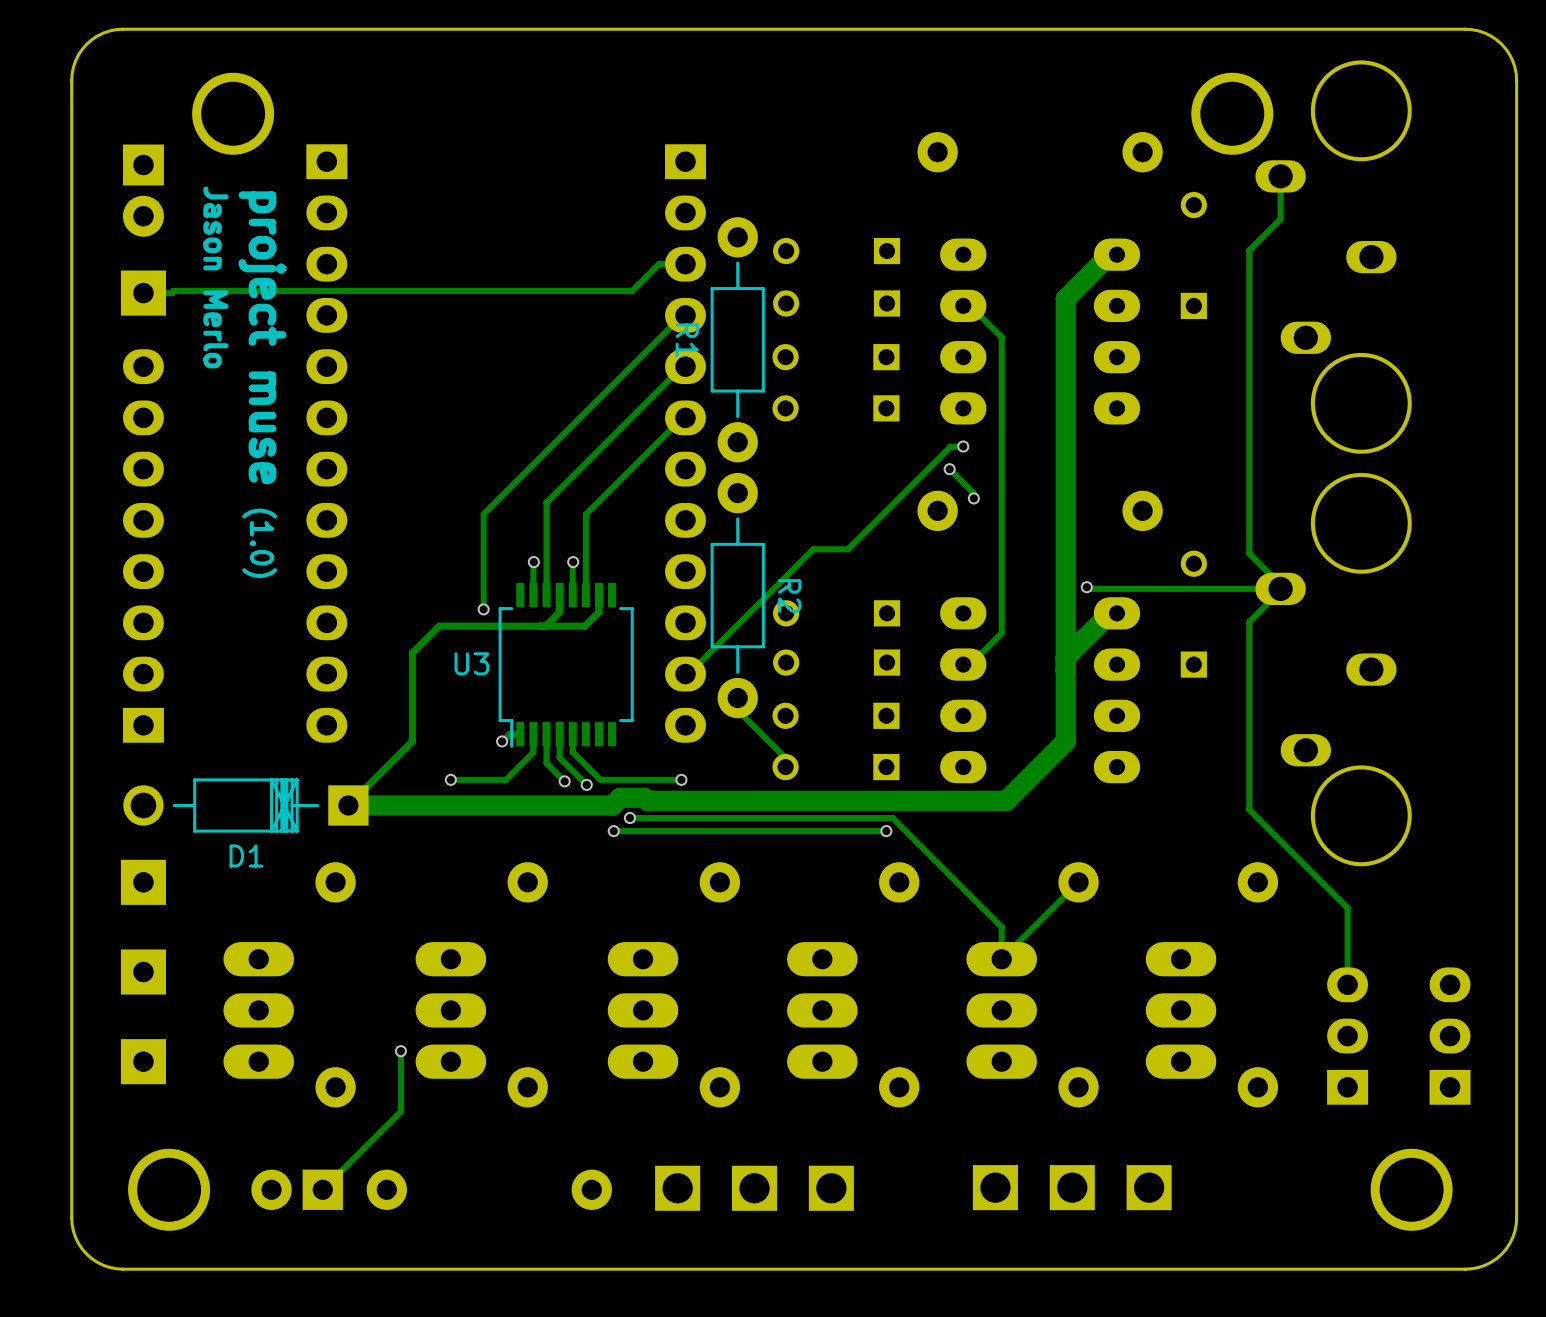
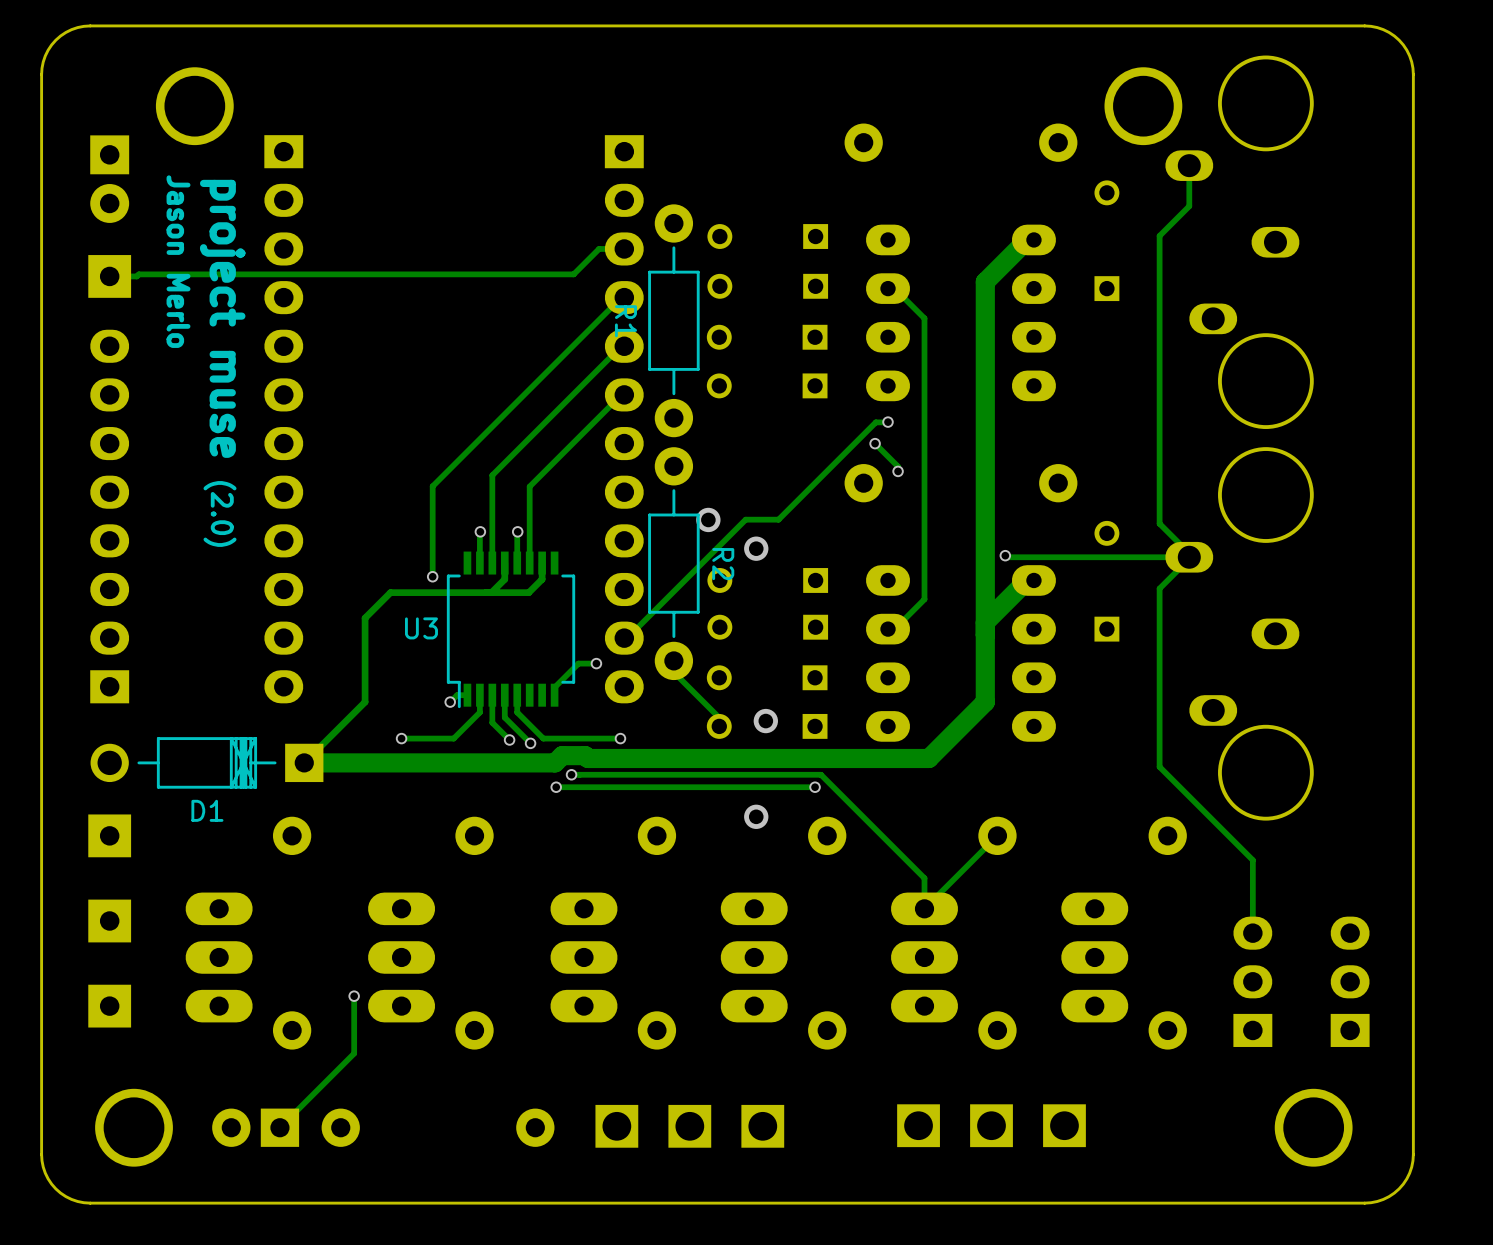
text: (1.0) (259, 543) -> (2.0) (220, 513)
via: none -> (708, 519)
via: none -> (756, 548)
track: none -> (596, 663) (578, 663) (554, 687) (554, 695)
via: none -> (596, 663)
via: none -> (765, 721)
via: none -> (756, 816)

